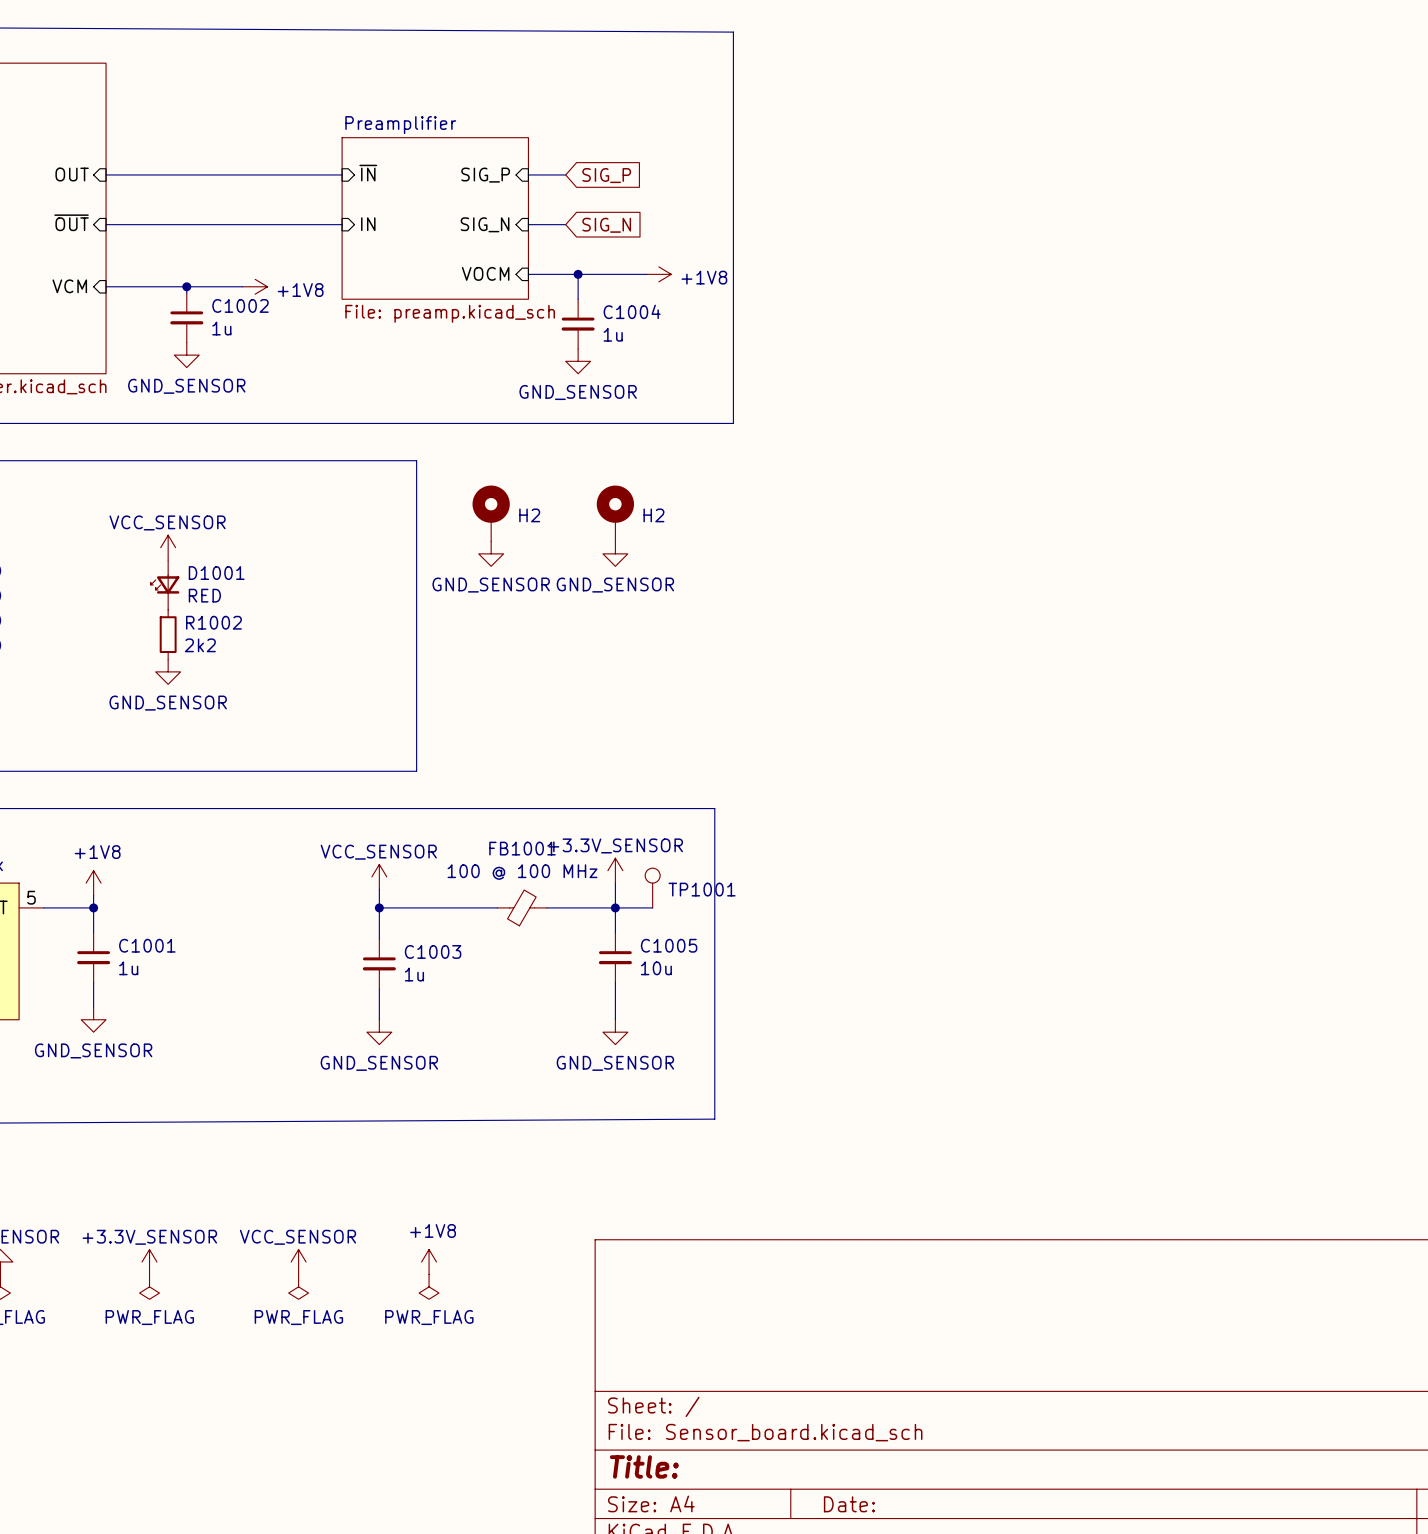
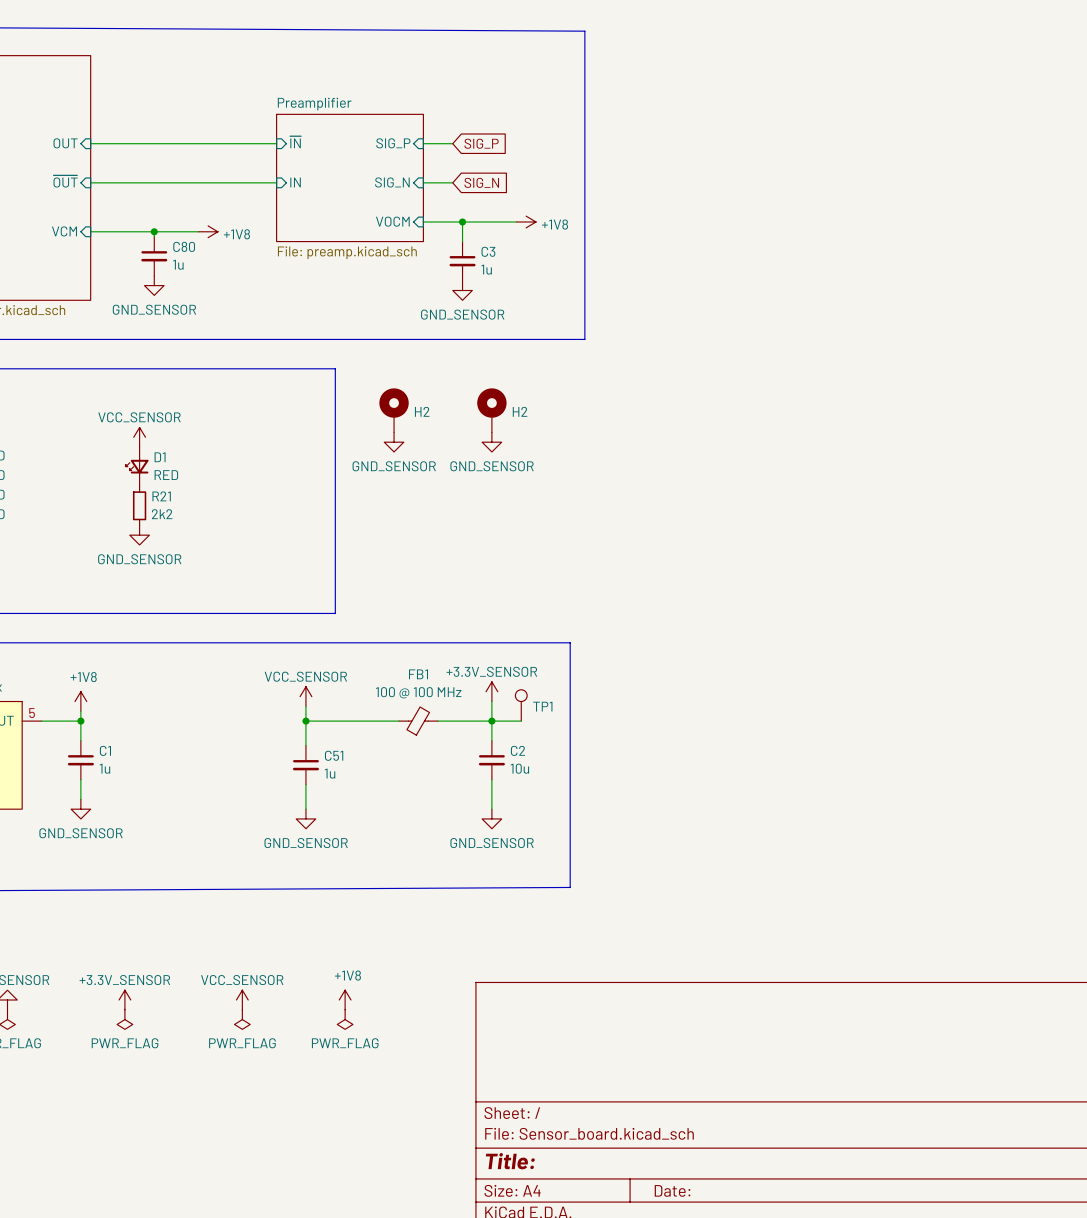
C1002 name: C1002 (240, 305) -> C80 (184, 246)
C1004 name: C1004 (632, 311) -> C3 (488, 251)
D1001 name: D1001 (216, 573) -> D1 (160, 457)
R1002 name: R1002 (213, 622) -> R21 (161, 496)
FB1001 name: FB1001 (522, 848) -> FB1 (418, 674)
TP1001 name: TP1001 (702, 889) -> TP1 (542, 706)
C1001 name: C1001 (147, 945) -> C1 (105, 750)
C1005 name: C1005 (669, 945) -> C2 (518, 750)
C1003 name: C1003 (433, 951) -> C51 (334, 755)

